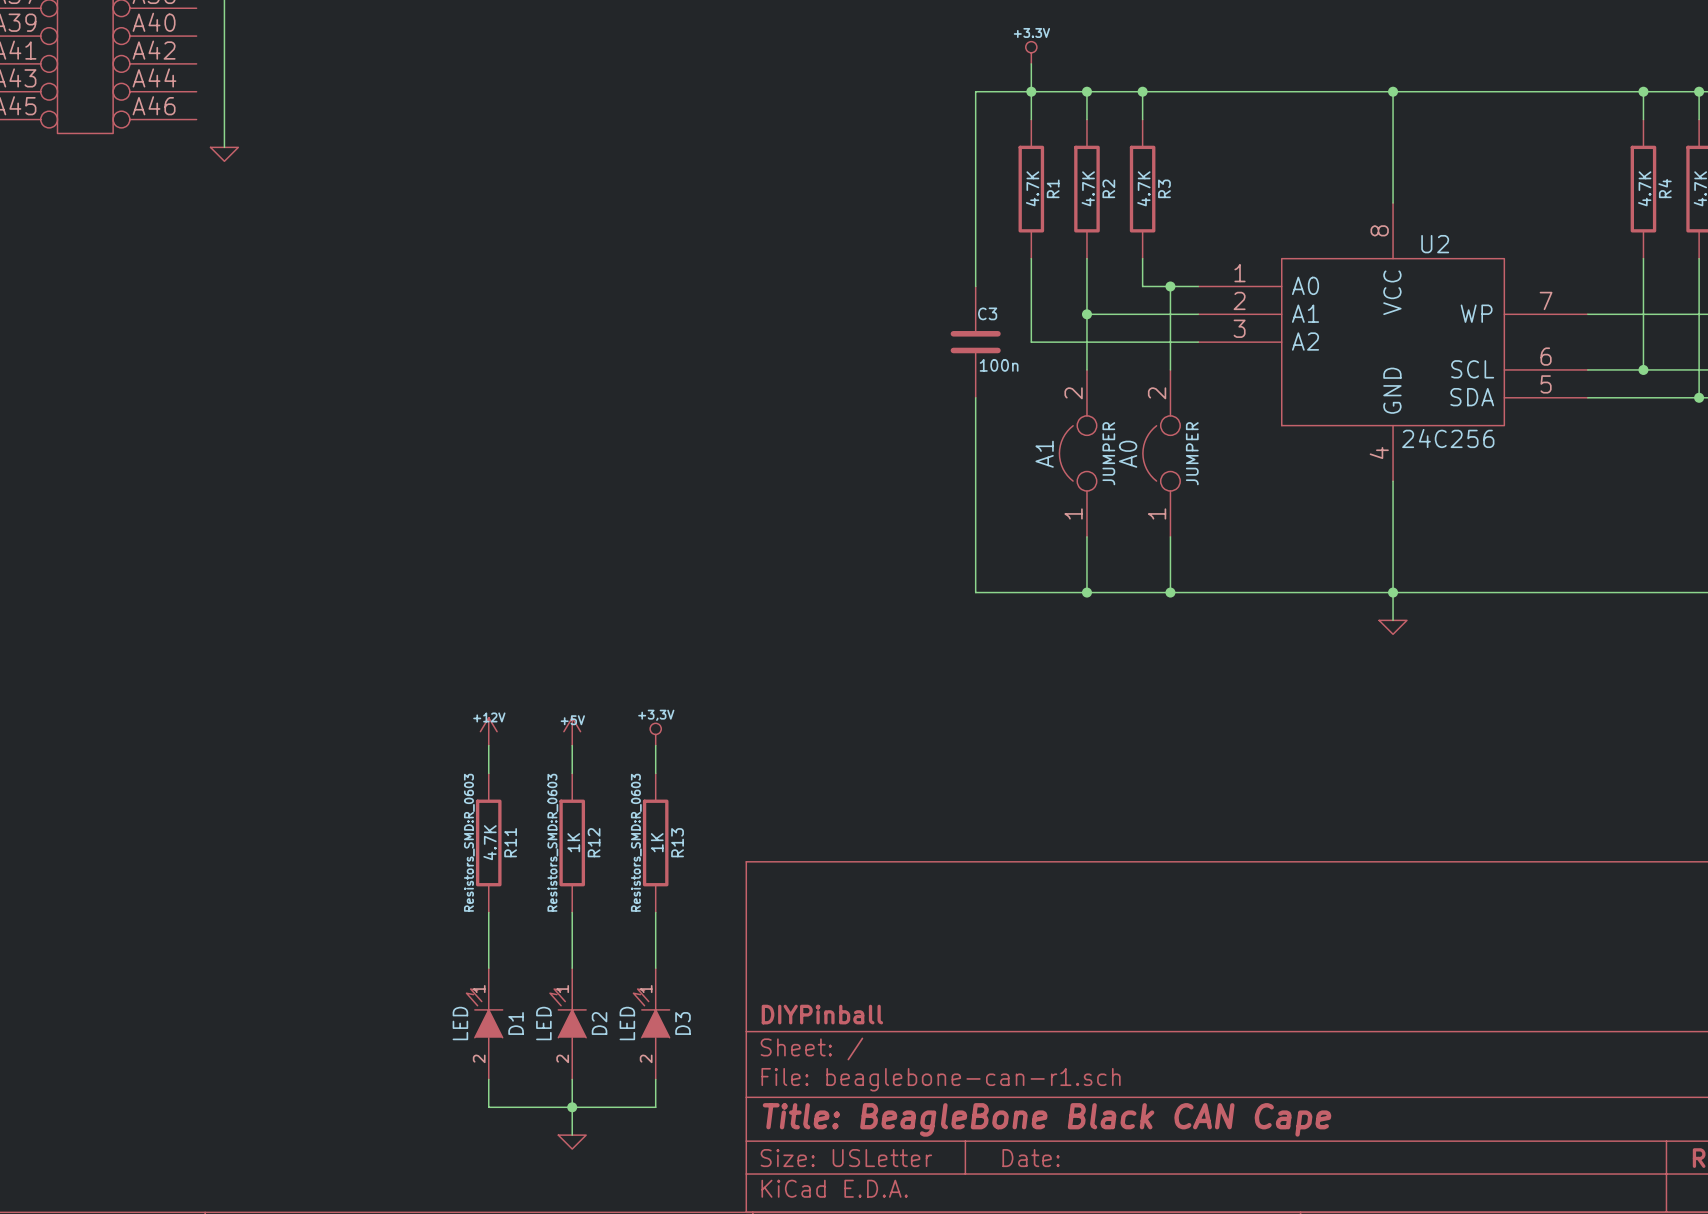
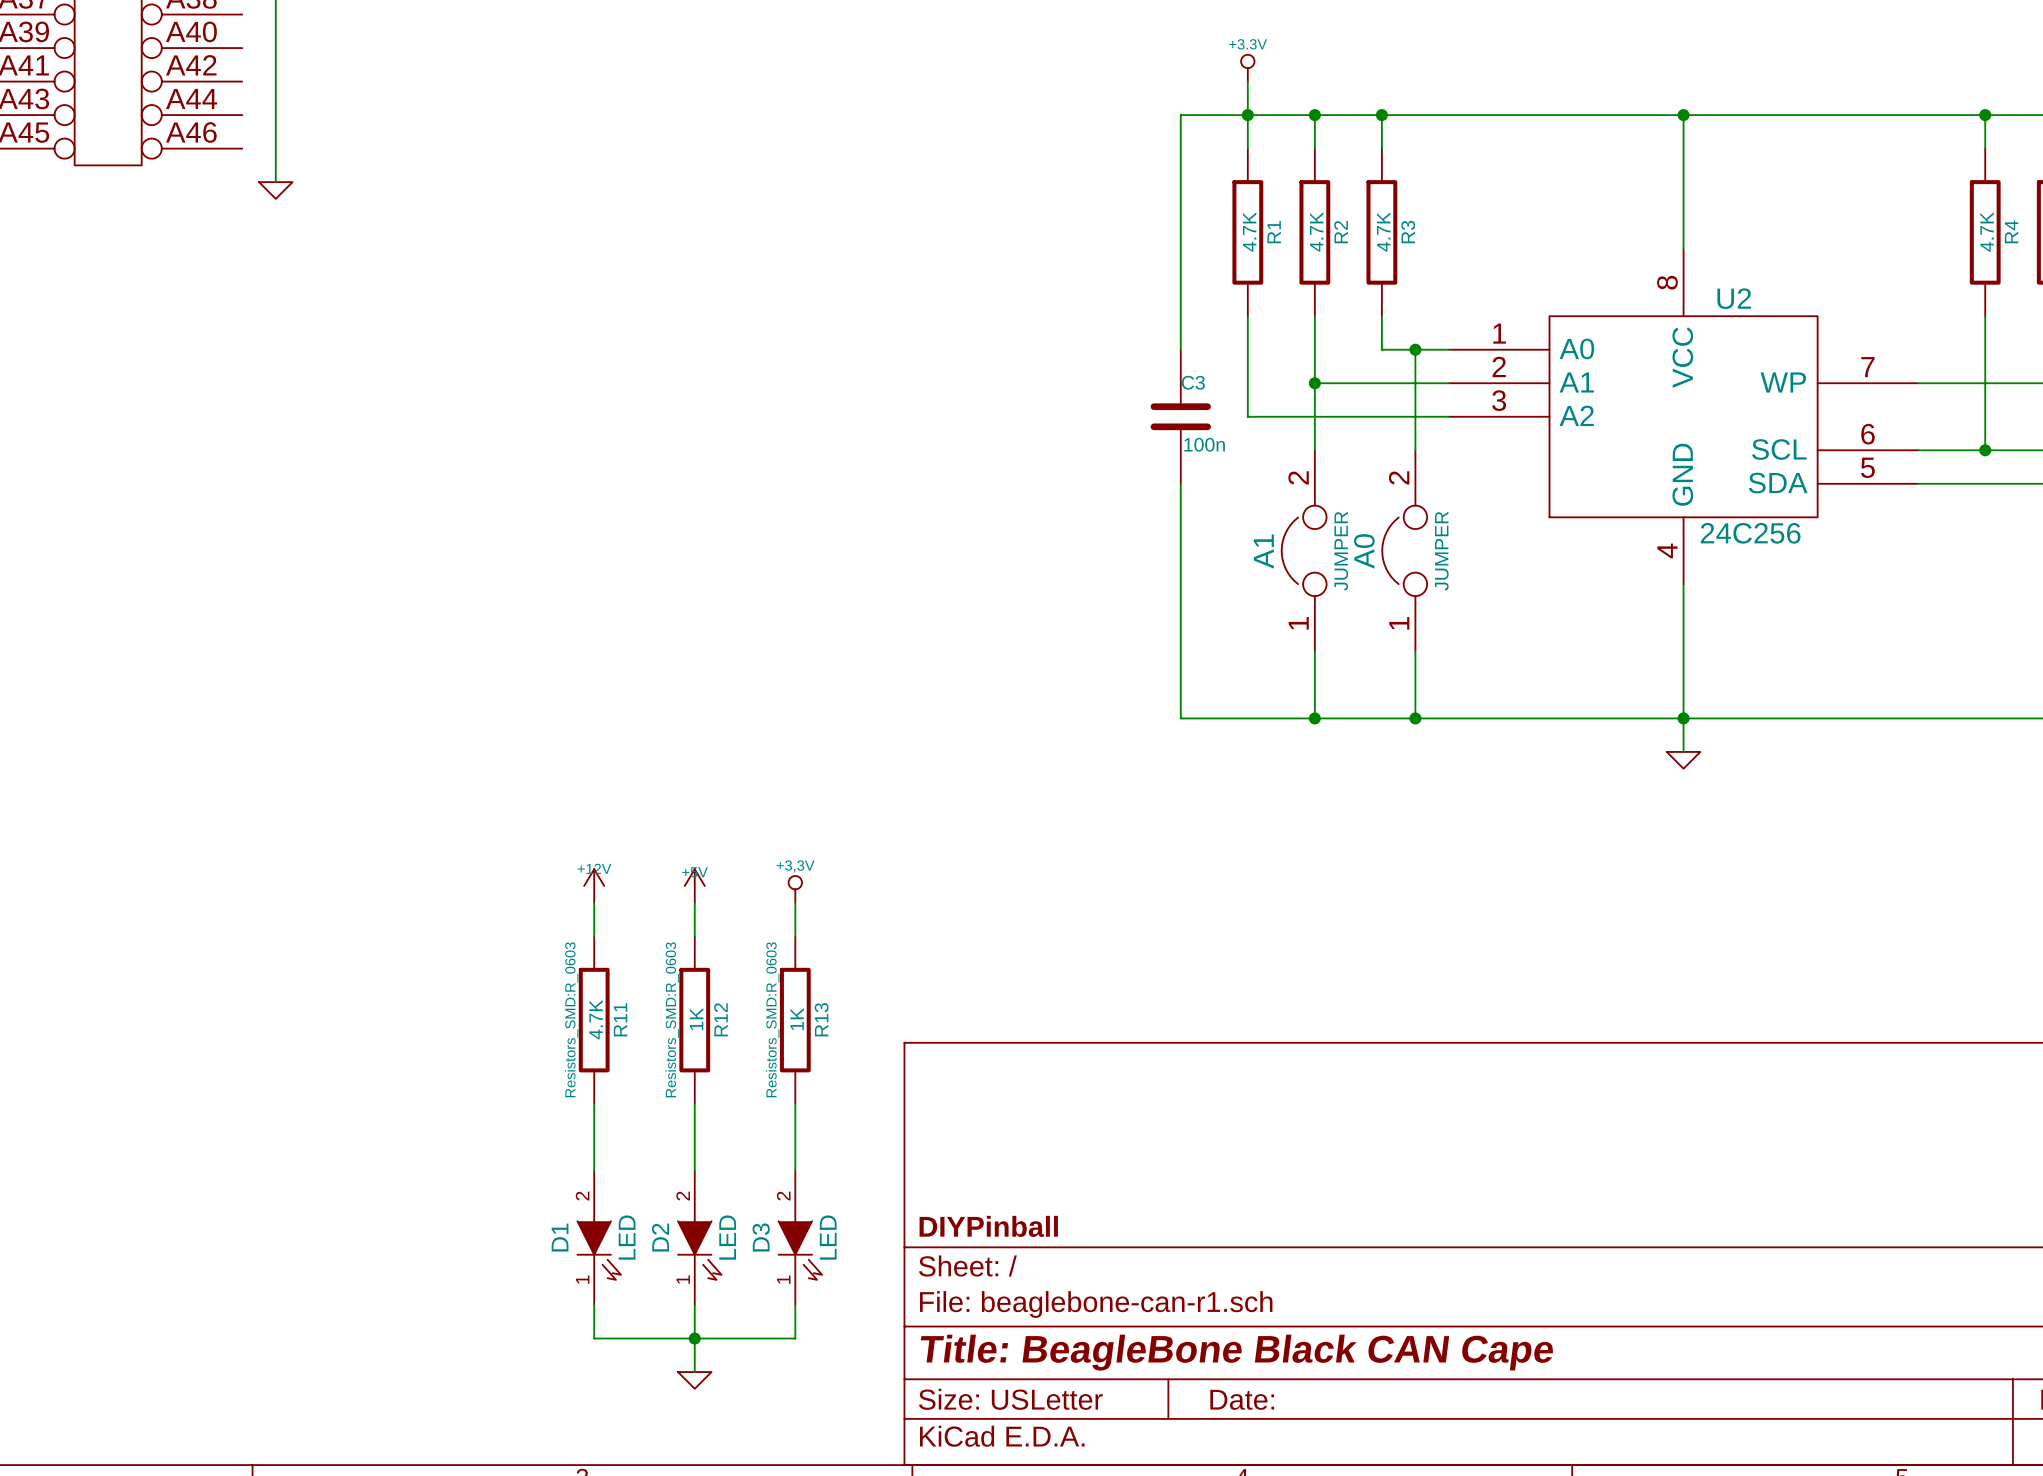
D1 rotation: 0° (484, 1013) -> 180° (599, 1250)
D2 rotation: 0° (568, 1013) -> 180° (699, 1250)
D3 rotation: 0° (651, 1013) -> 180° (800, 1250)

